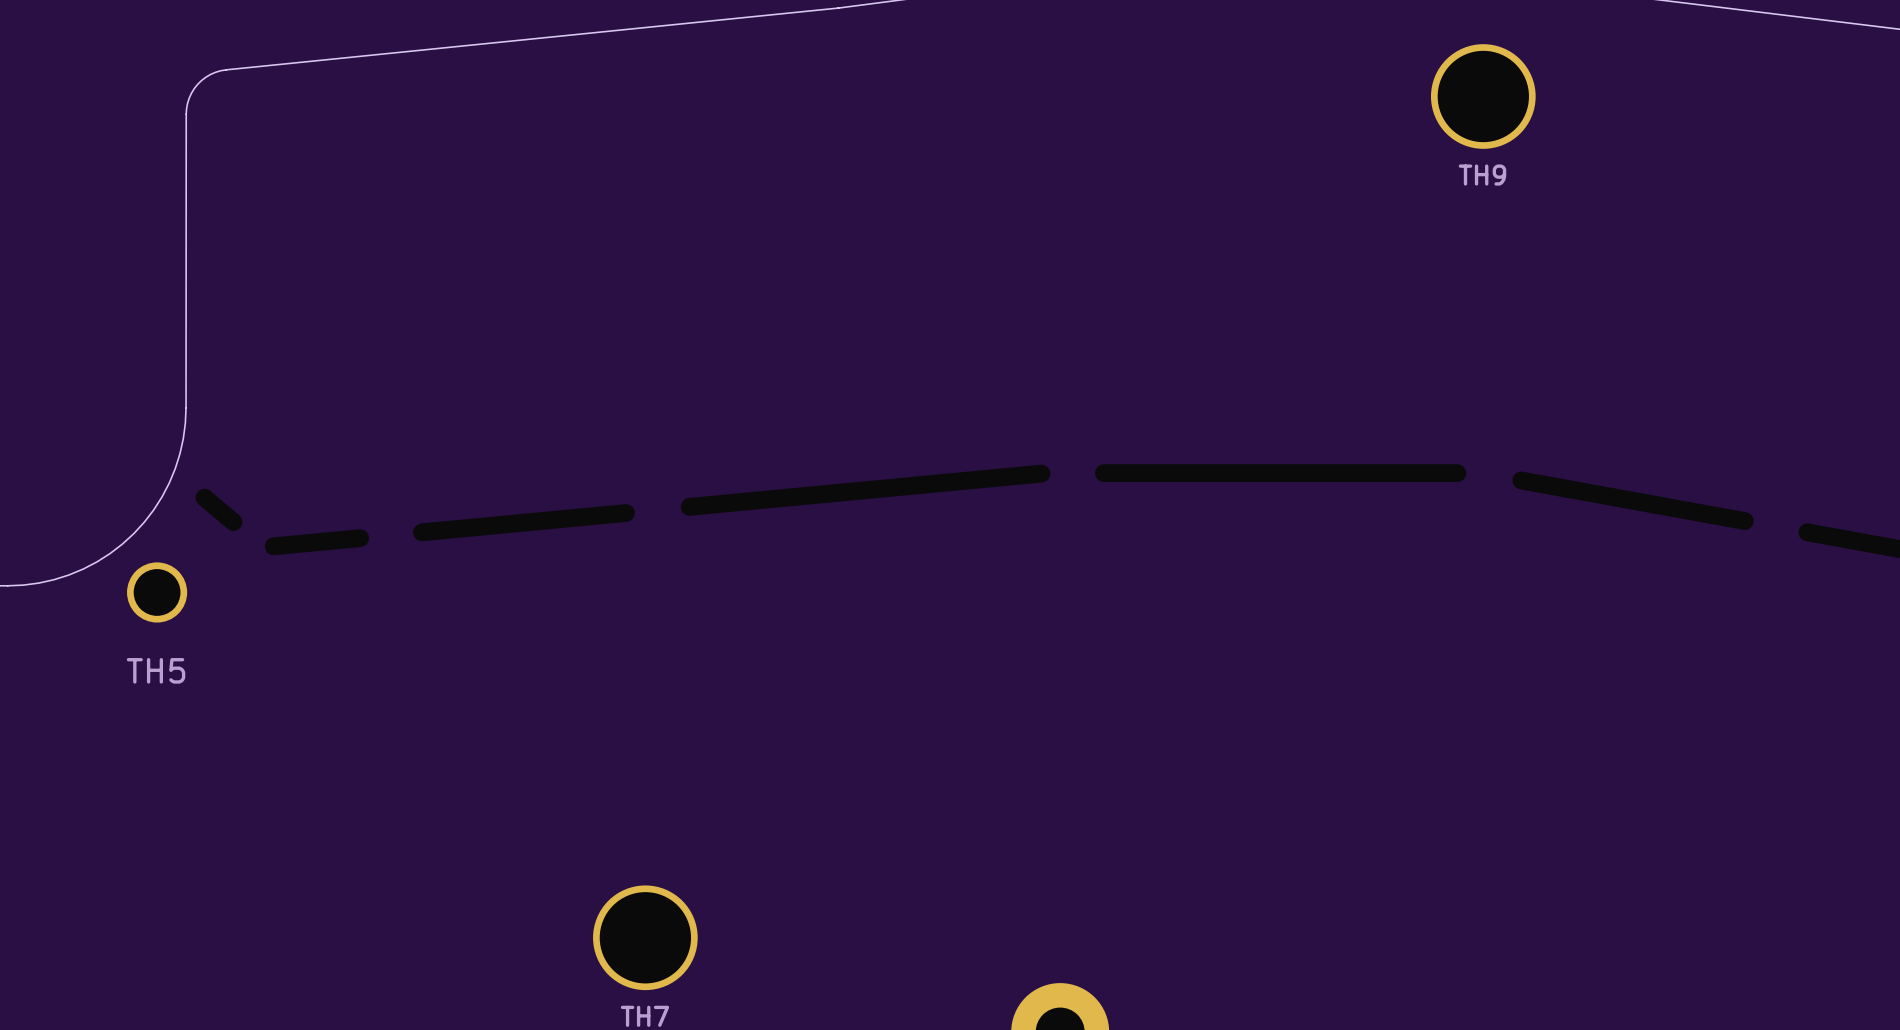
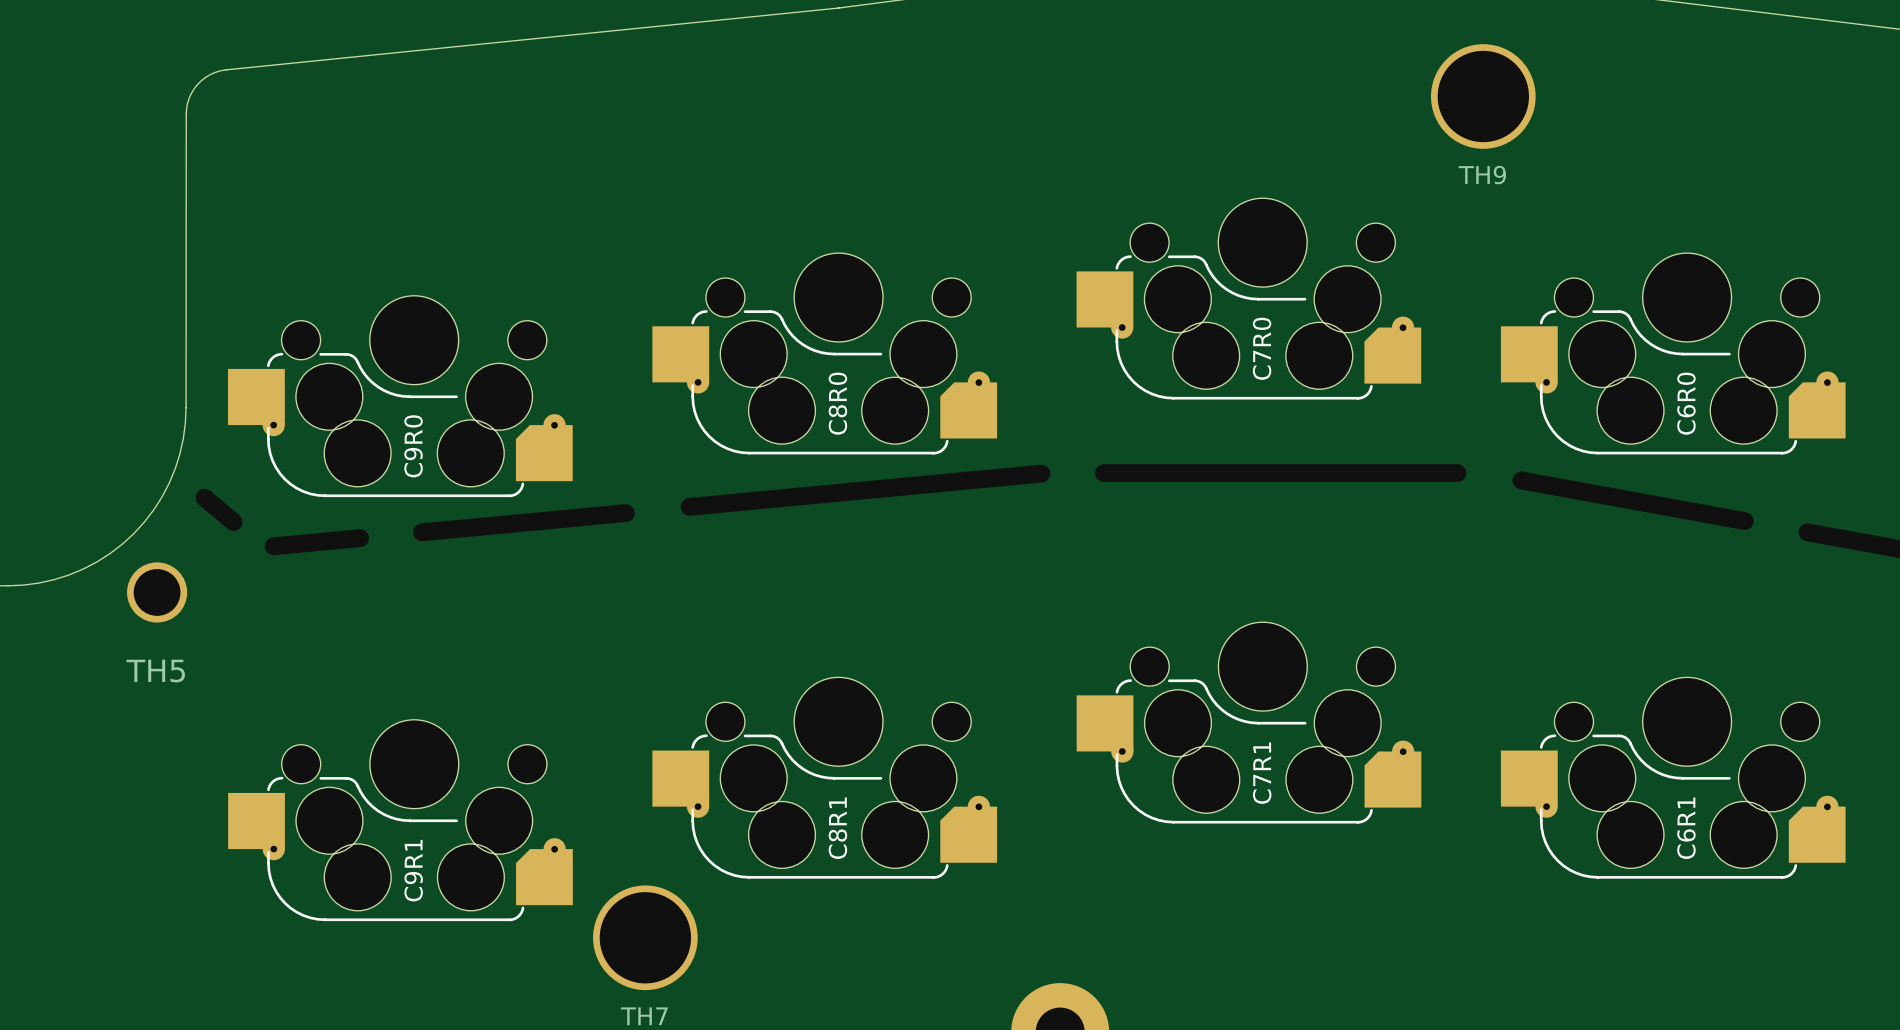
C7R0: none -> (1248, 298)
C8R0: none -> (824, 353)
C6R0: none -> (1673, 353)
C9R0: none -> (400, 396)
C7R1: none -> (1249, 722)
C8R1: none -> (824, 778)
C6R1: none -> (1673, 778)
C9R1: none -> (400, 820)

